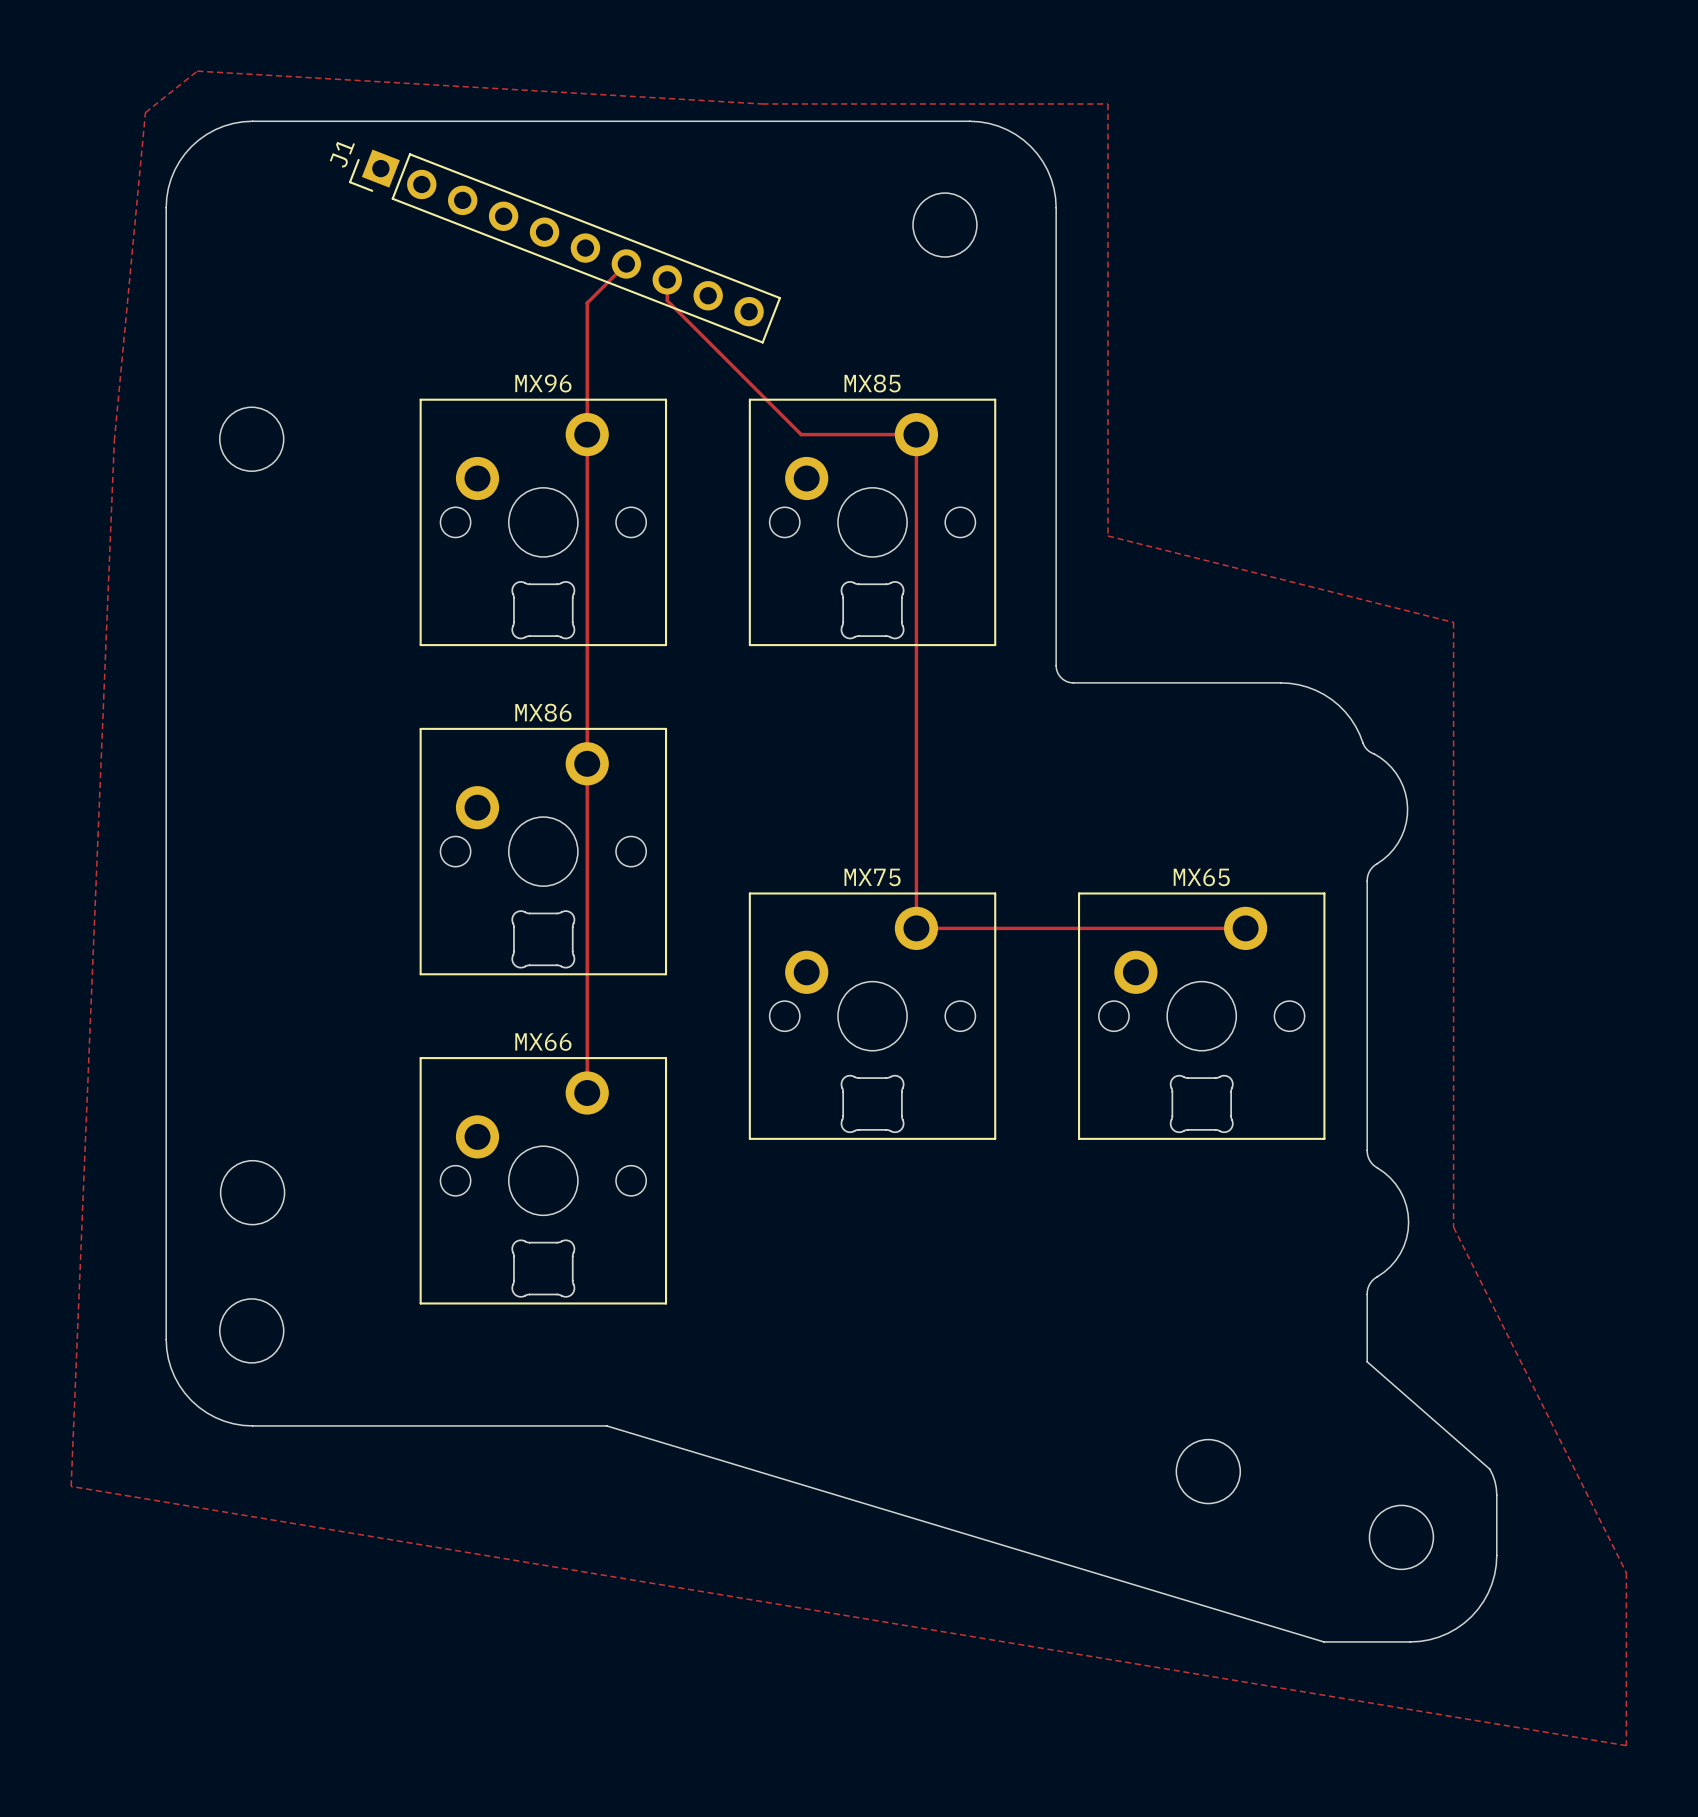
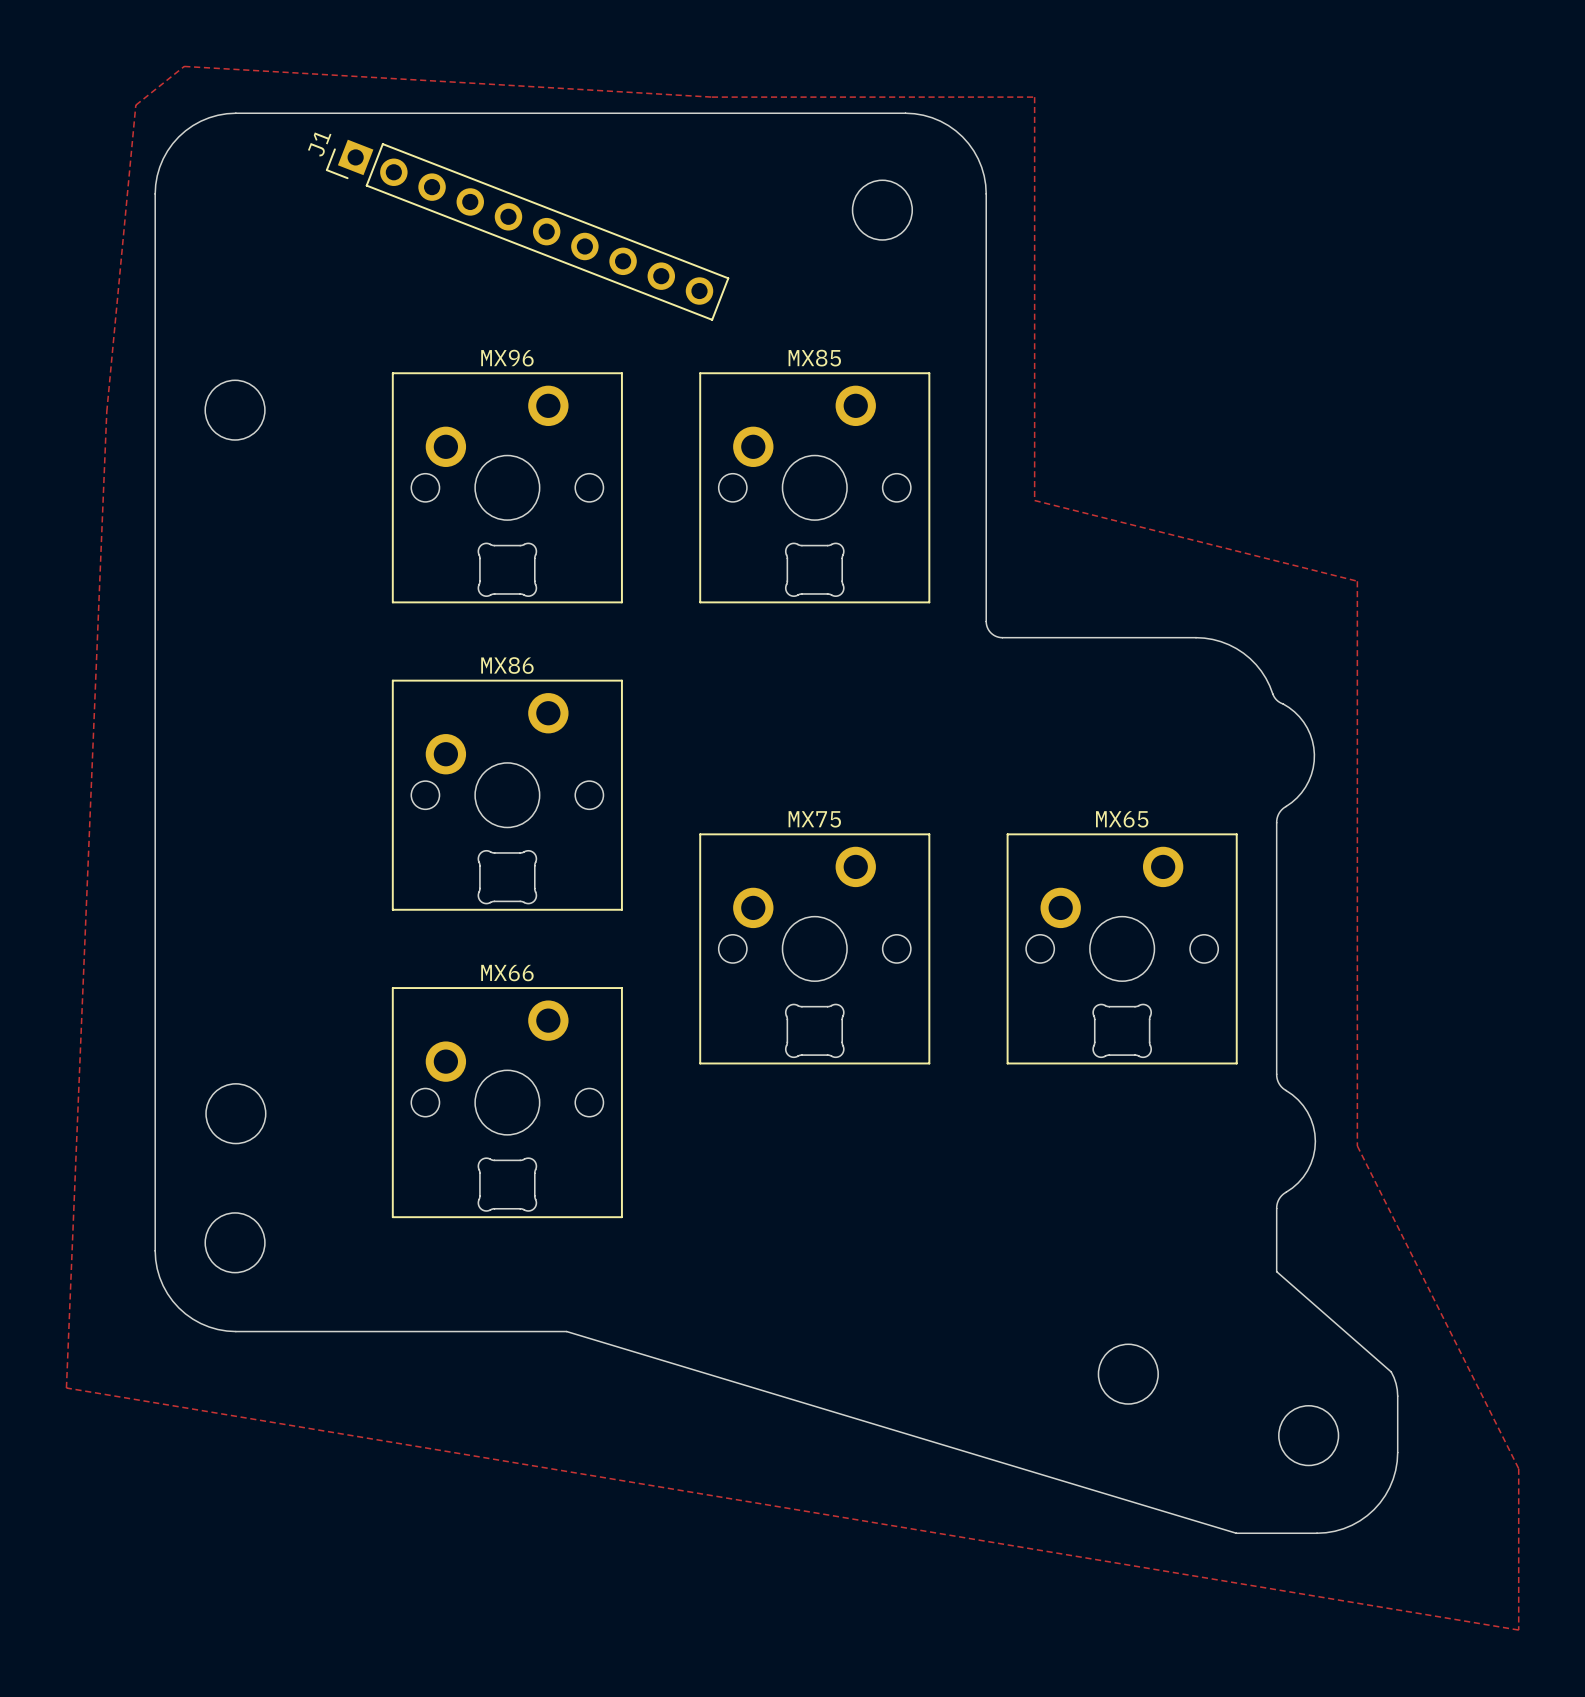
track: (626, 263) (587, 303) (587, 1092) -> none
track: (667, 279) (667, 300) (801, 434) (916, 434) (916, 928) (1245, 928) -> none

